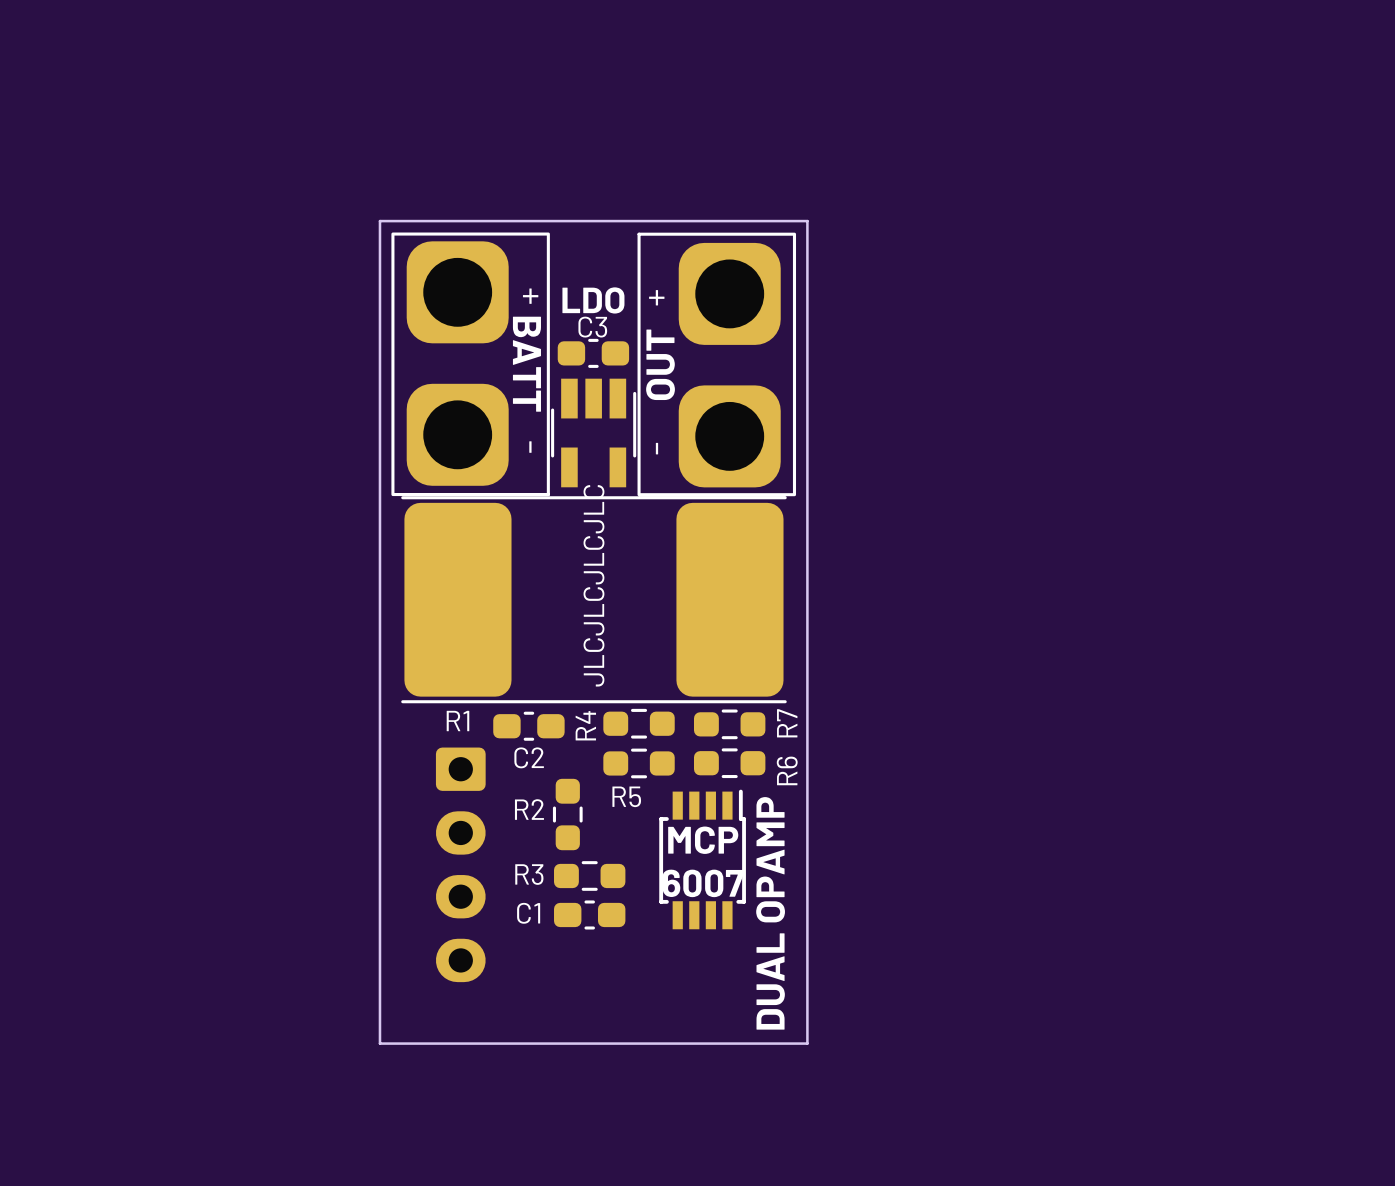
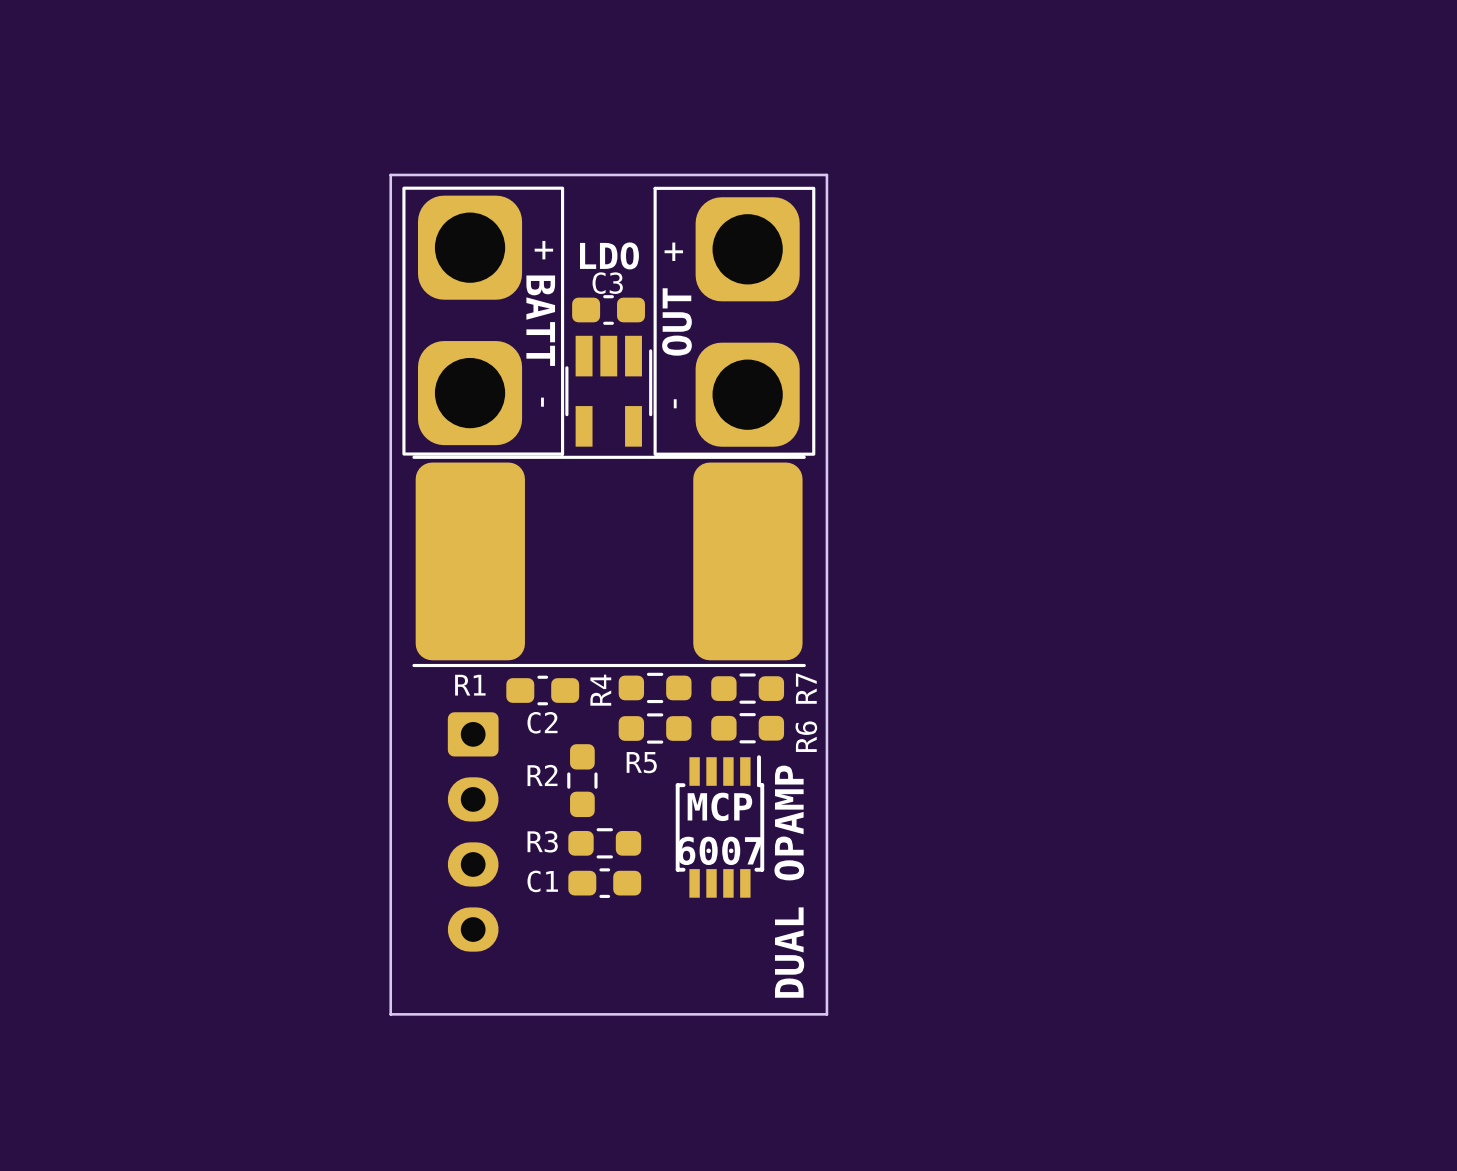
text: JLCJLCJLCJLC (593, 585) -> none

